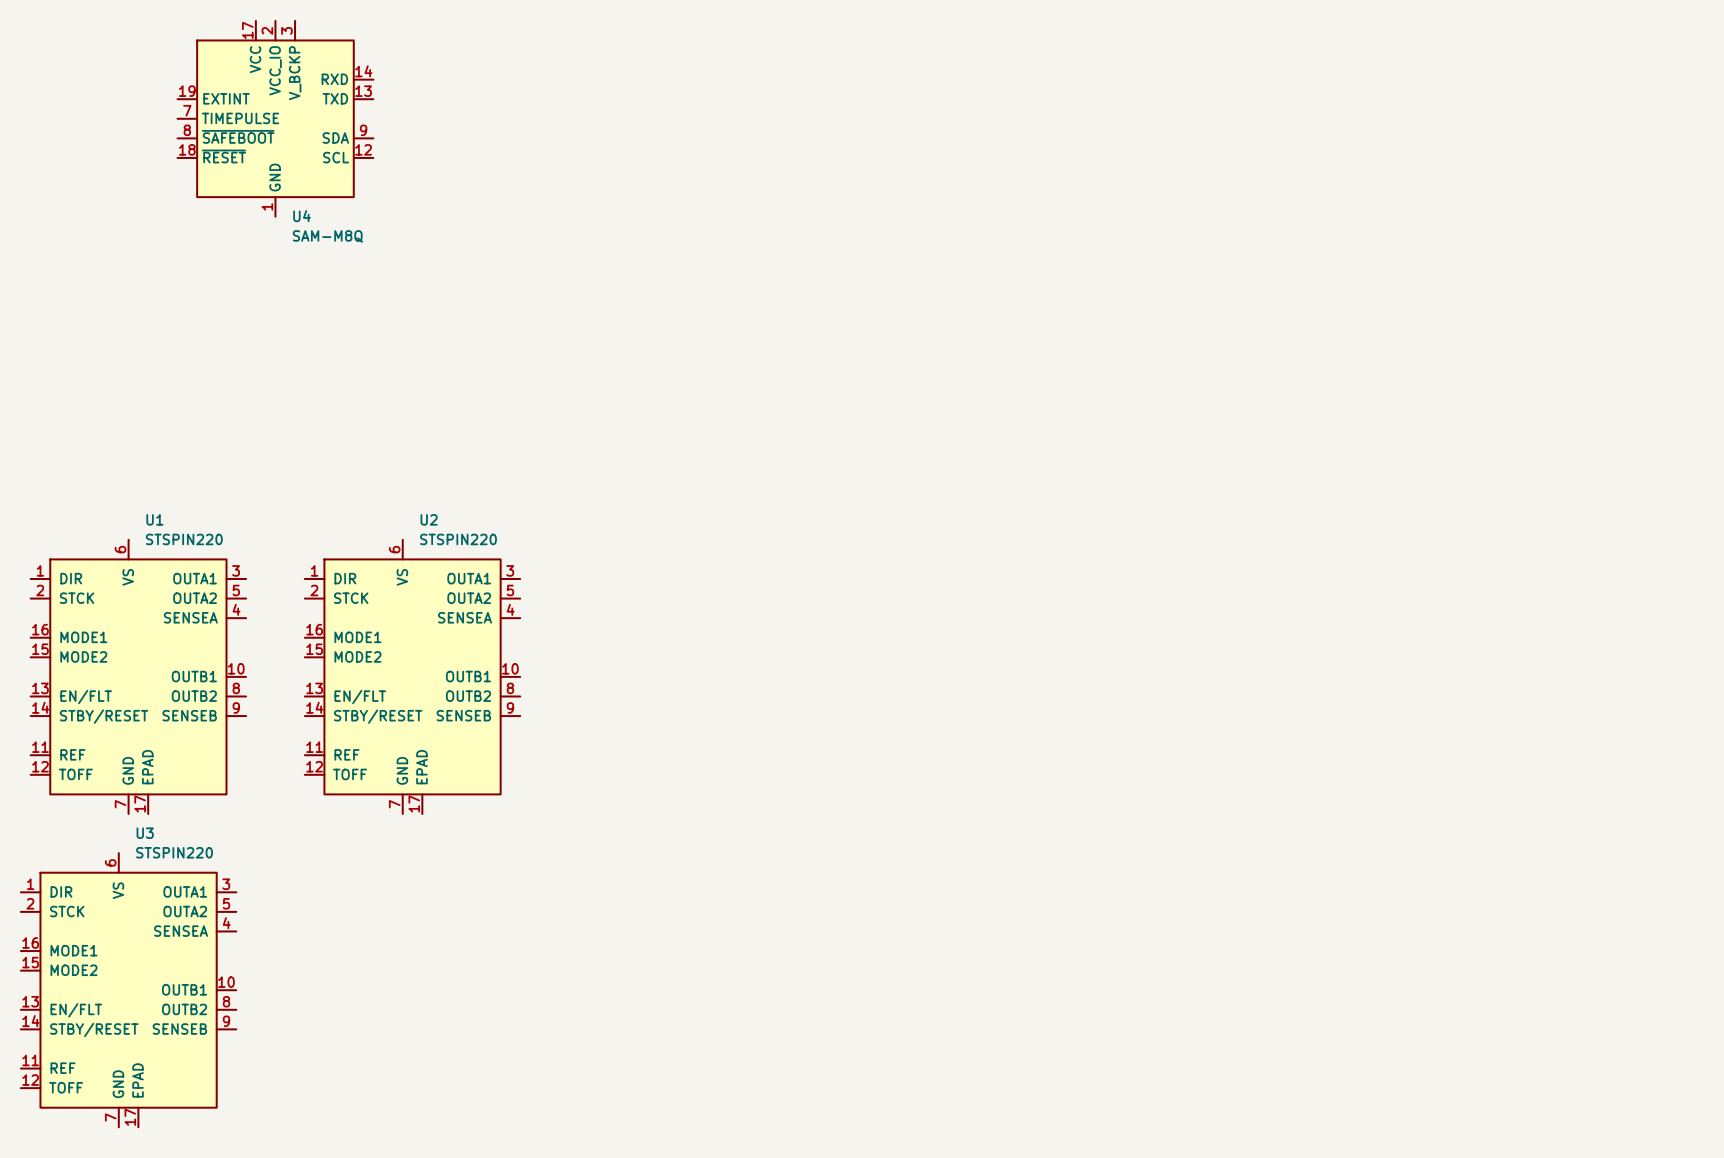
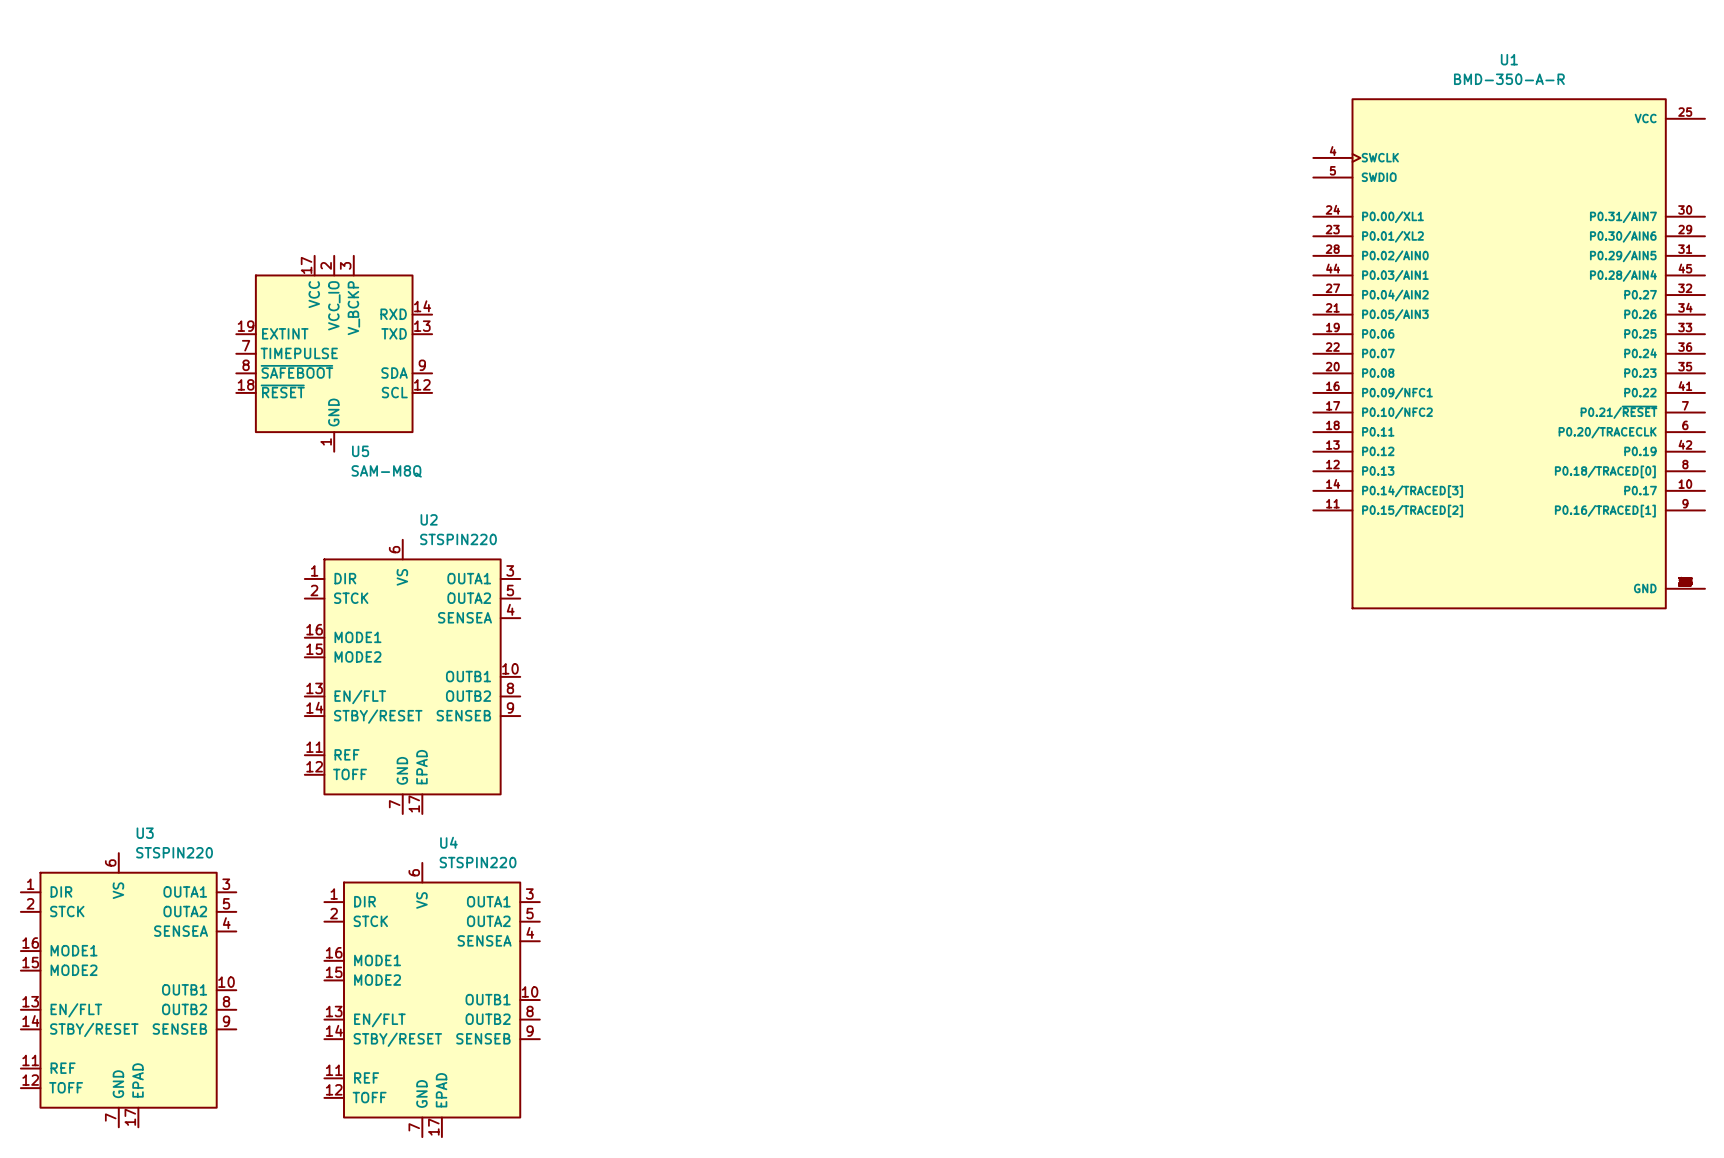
U4 symbol: [177, 20, 374, 217] -> [324, 862, 540, 1138]
U4 name position: U4 (302, 216) -> U4 (448, 842)
U4 value: SAM-M8Q (327, 236) -> STSPIN220 (478, 862)
U5: none -> SAM-M8Q (334, 353)
U1 name position: U1 (154, 519) -> U1 (1509, 59)
U1 symbol: [30, 539, 247, 814] -> [1313, 98, 1705, 610]
U1 value: STSPIN220 (184, 539) -> BMD-350-A-R (1509, 79)

